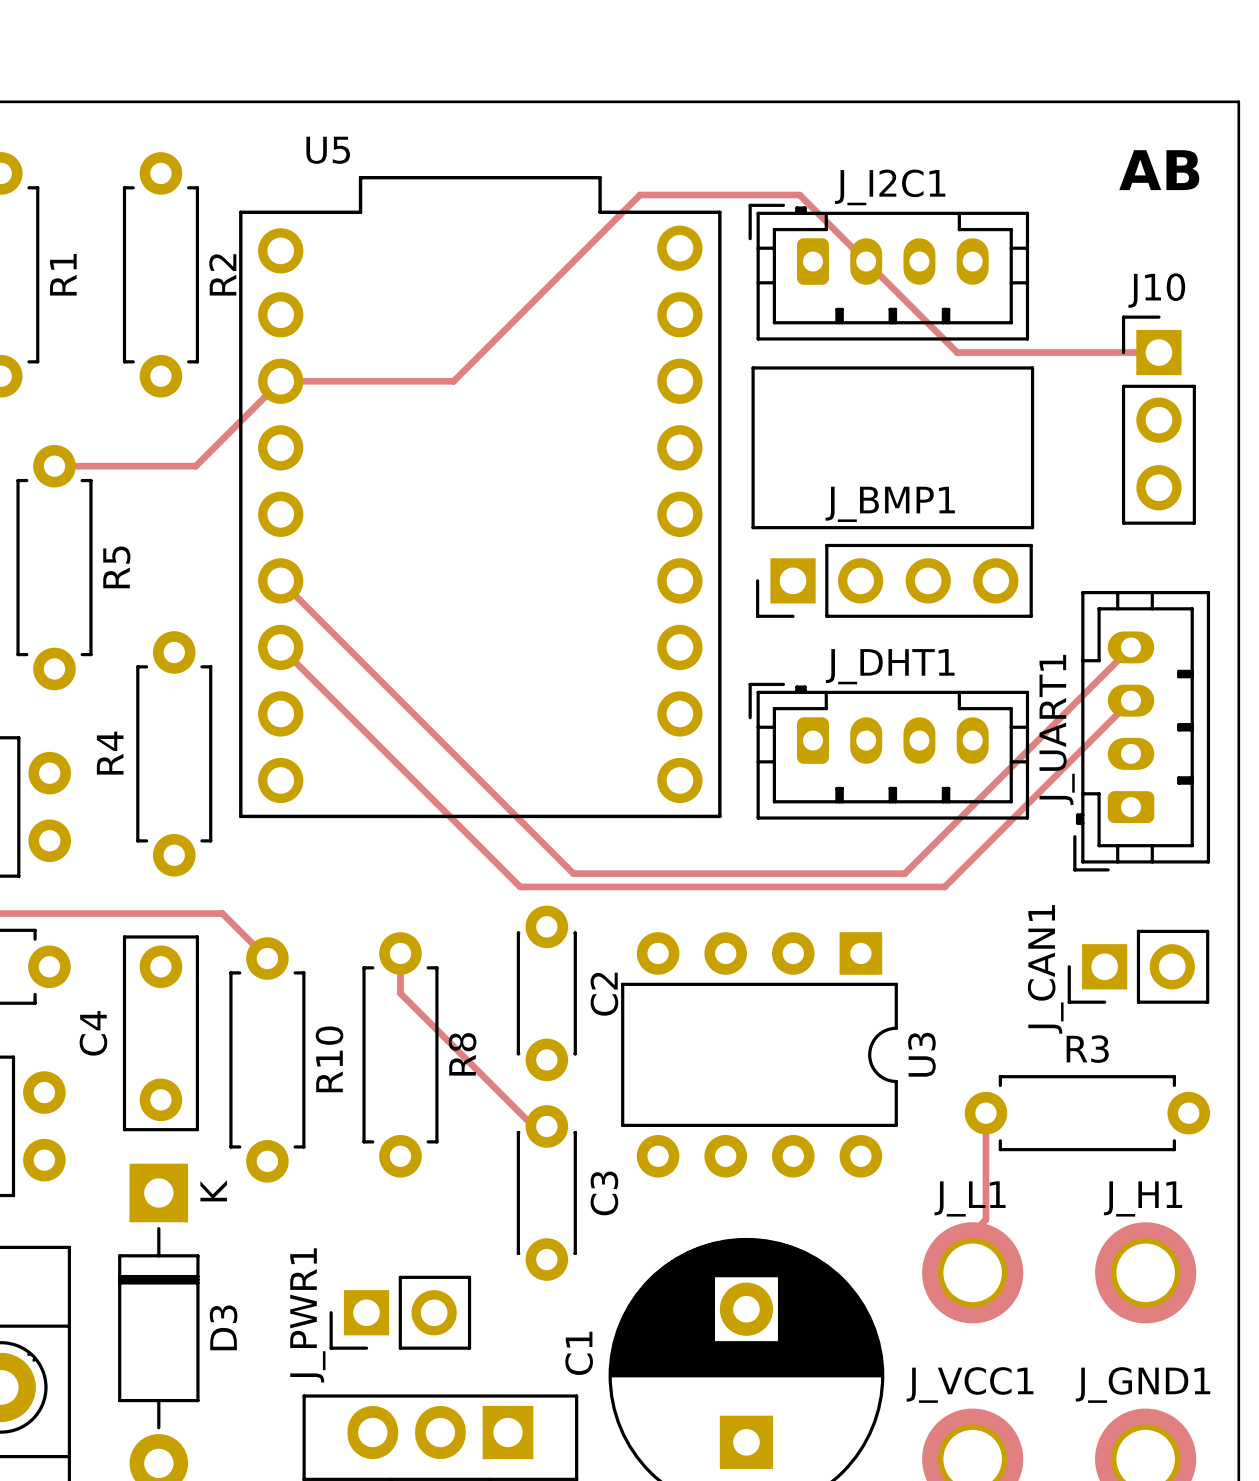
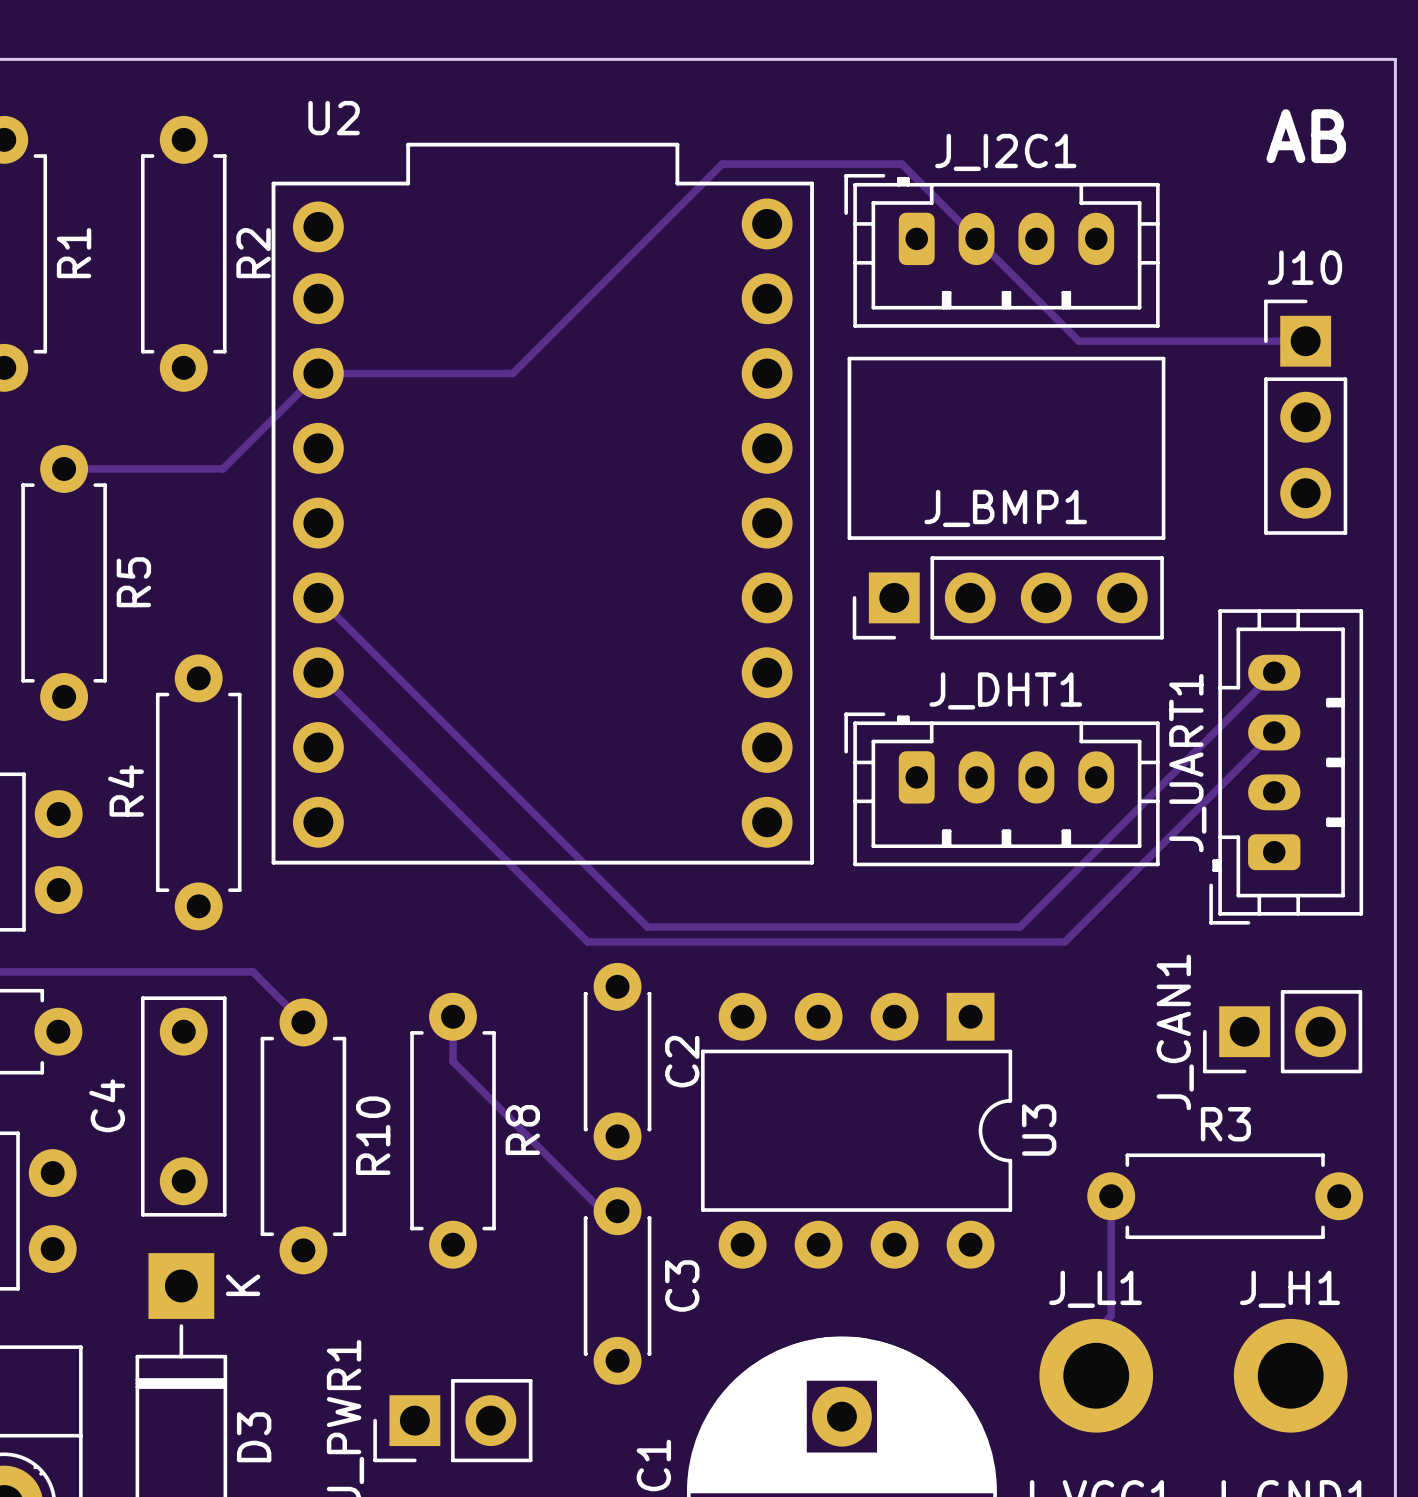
U5 name: U5 (328, 150) -> U2 (334, 118)

